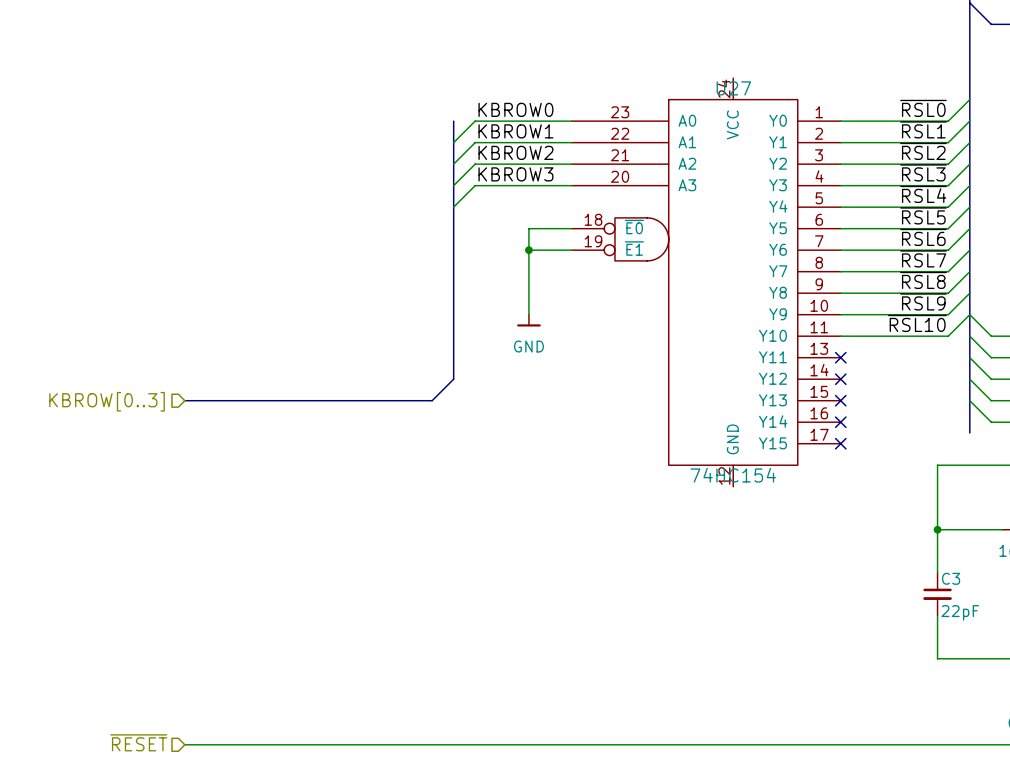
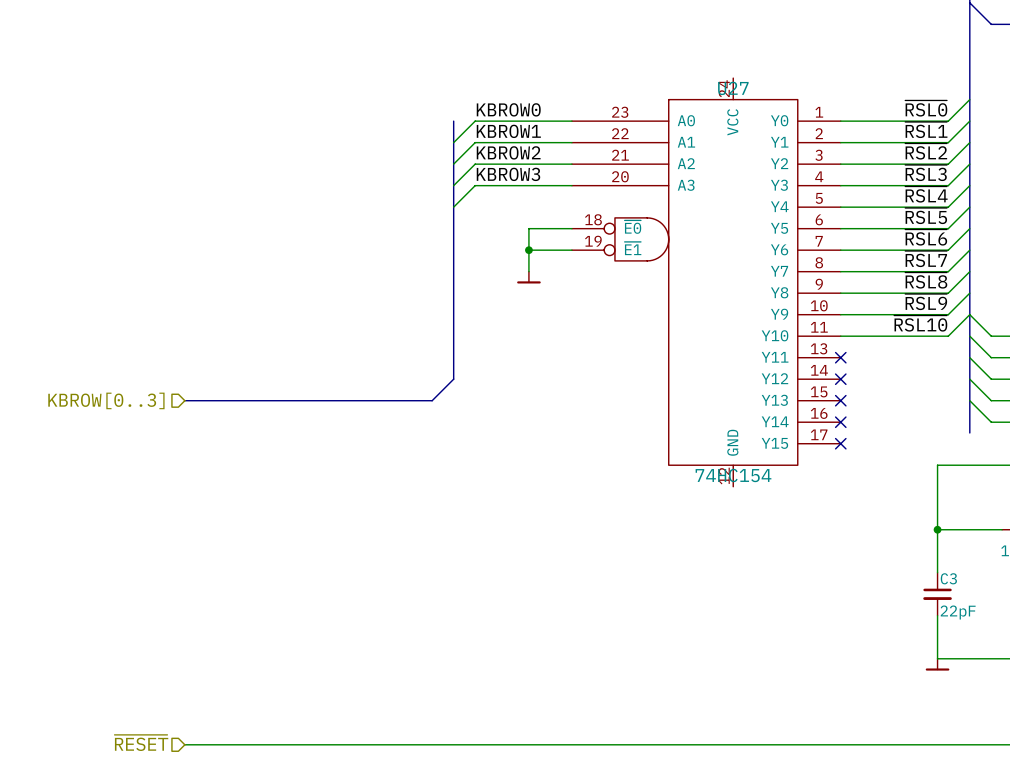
wire: (528, 271) (528, 314) -> none
power symbol: none -> (528, 277)
power symbol: GND (528, 320) -> none
power symbol: none -> (937, 664)

